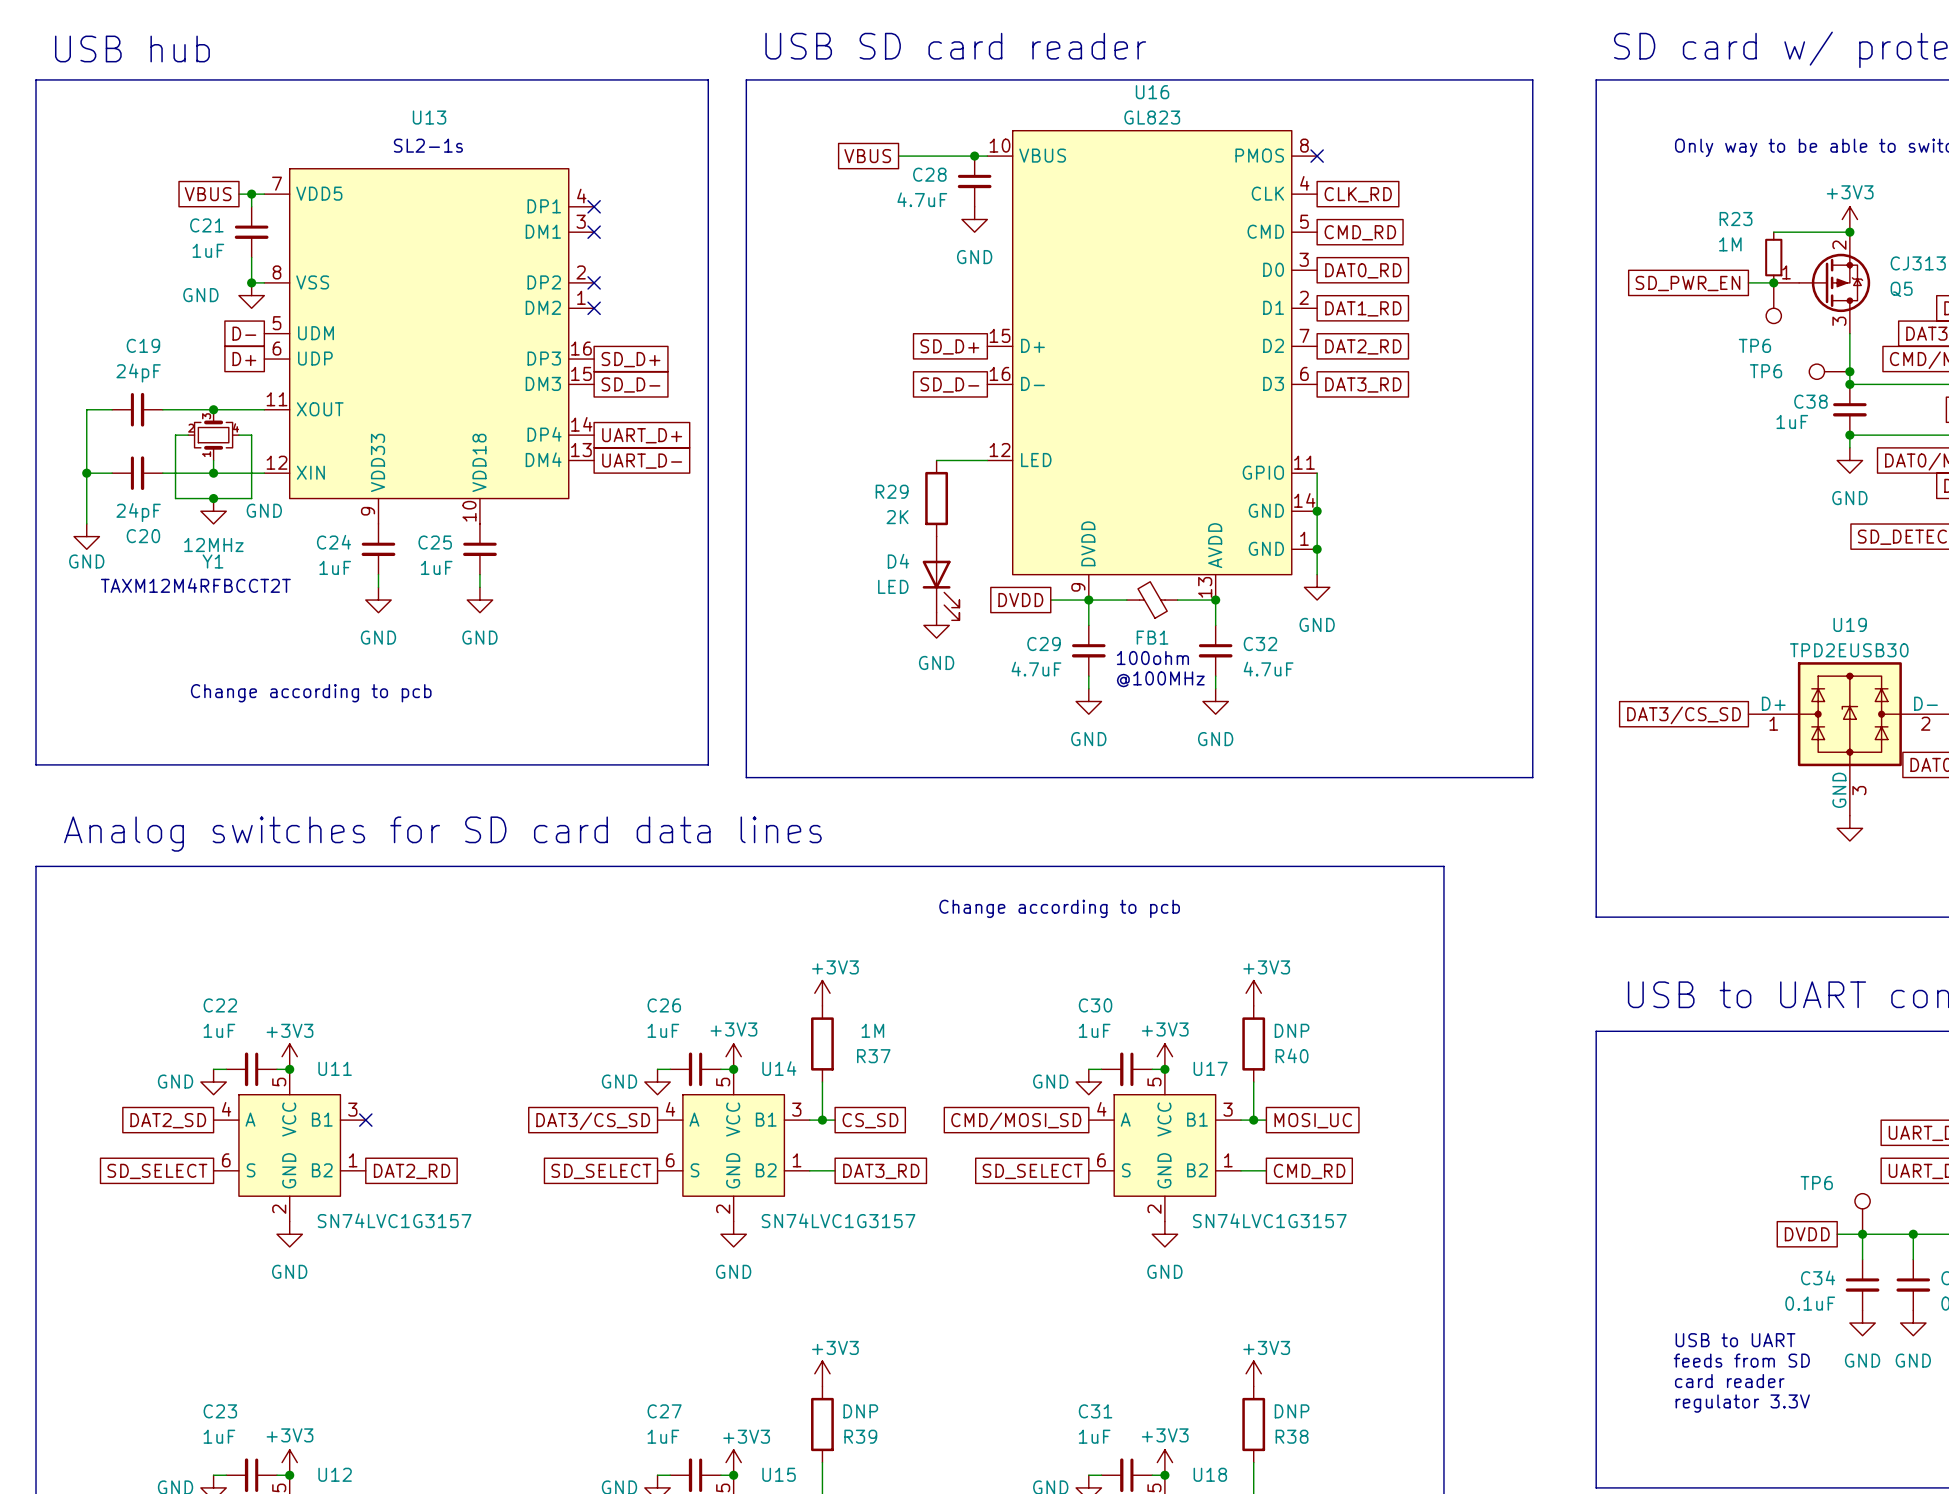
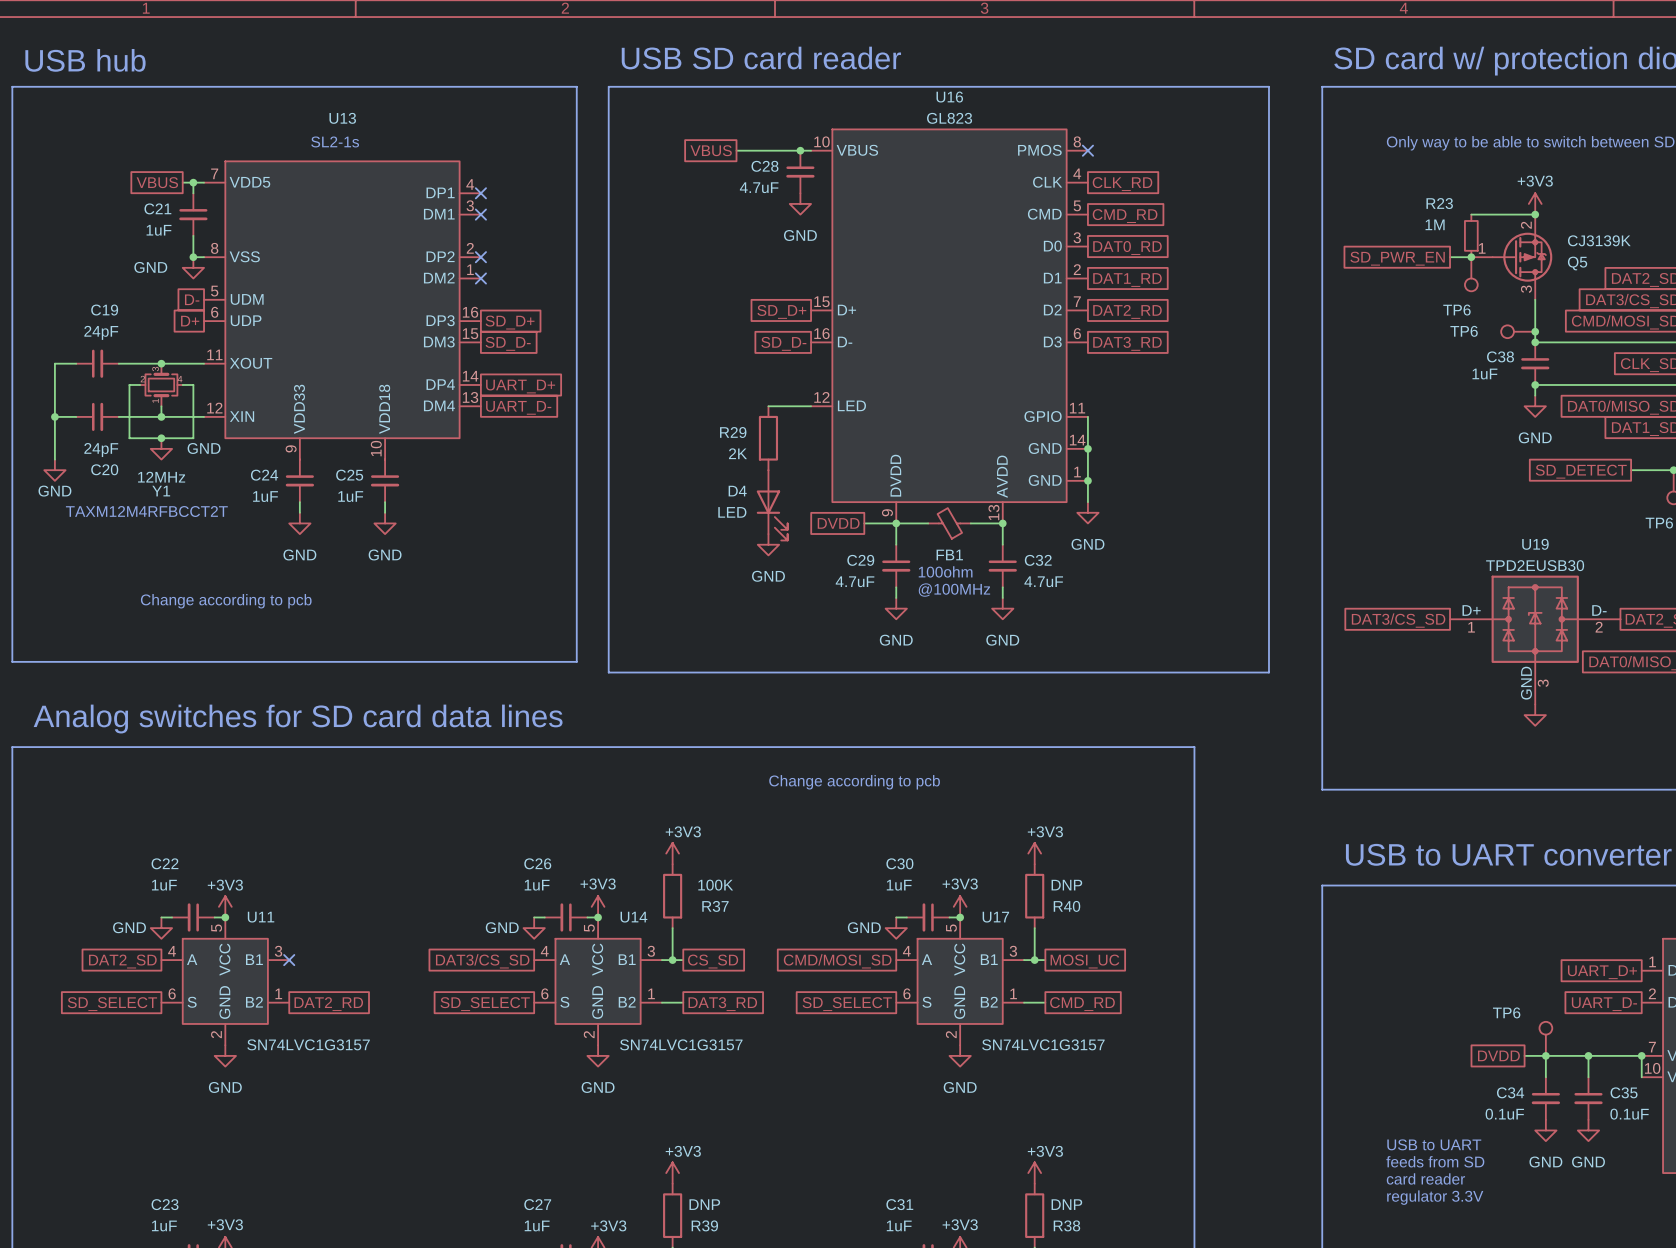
R37 value: 1M (872, 1030) -> 100K (715, 885)

